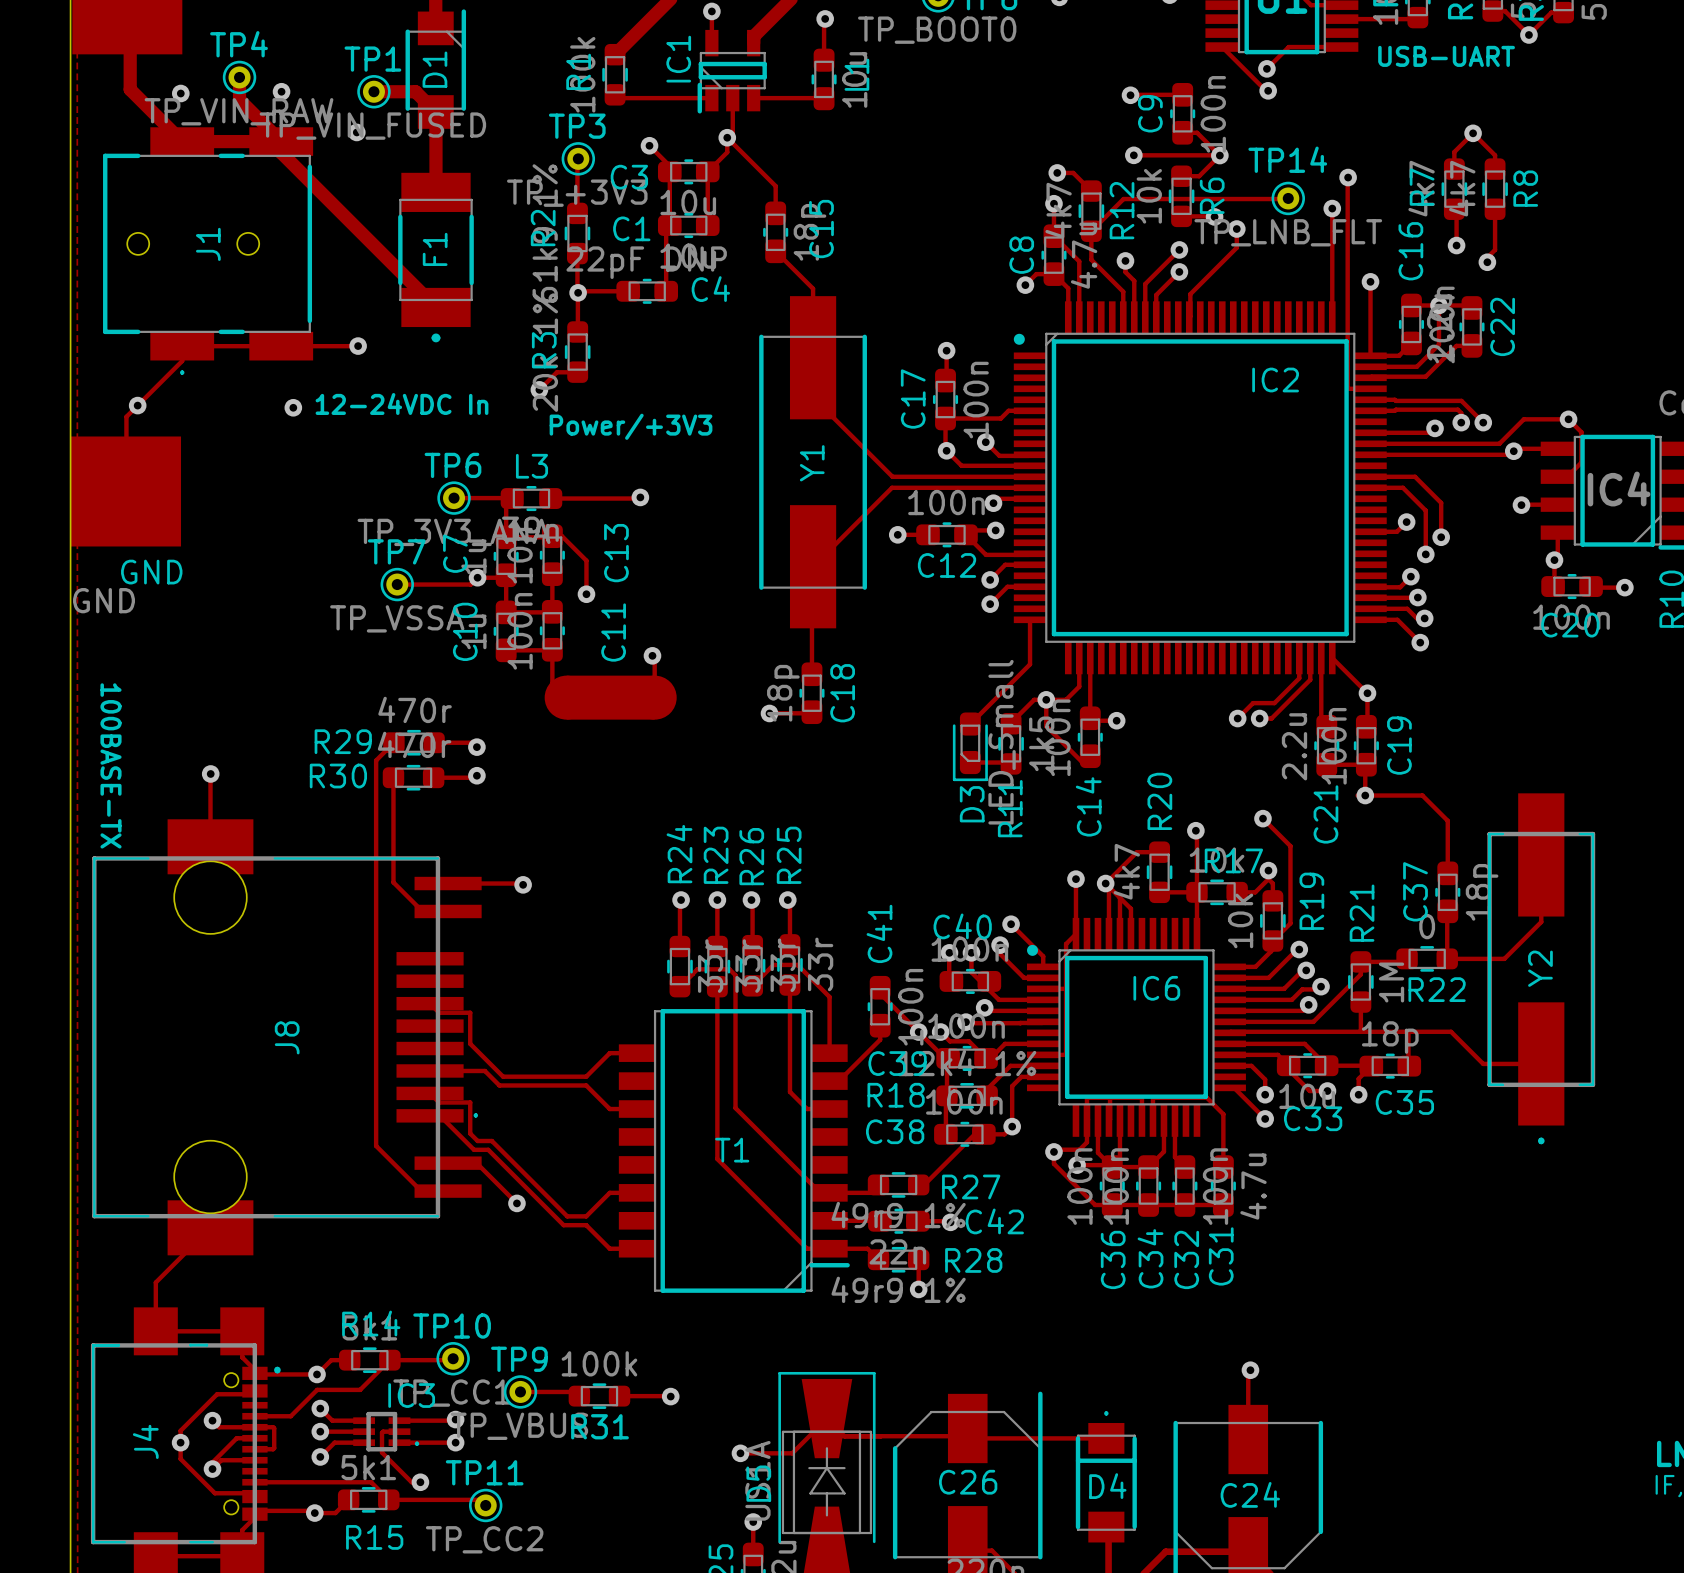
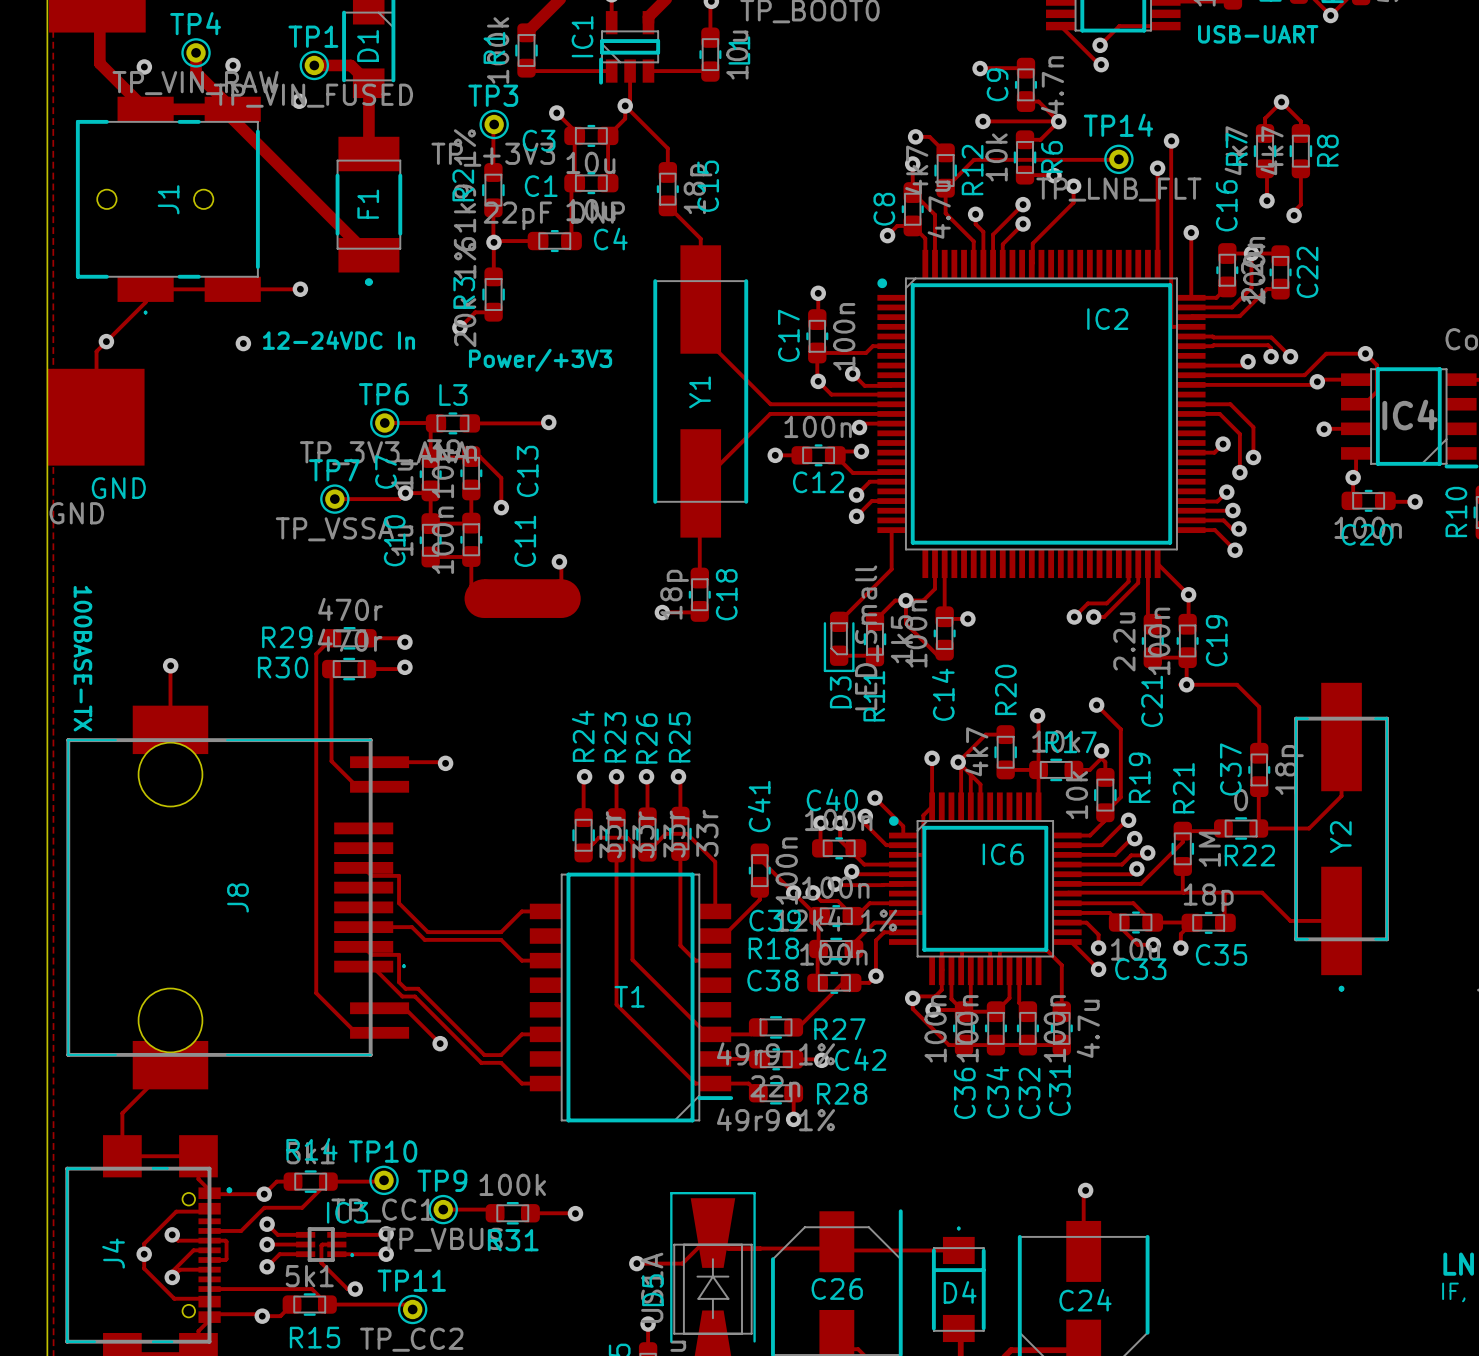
C9 value: 100n (1213, 114) -> 4.7n (1052, 85)

